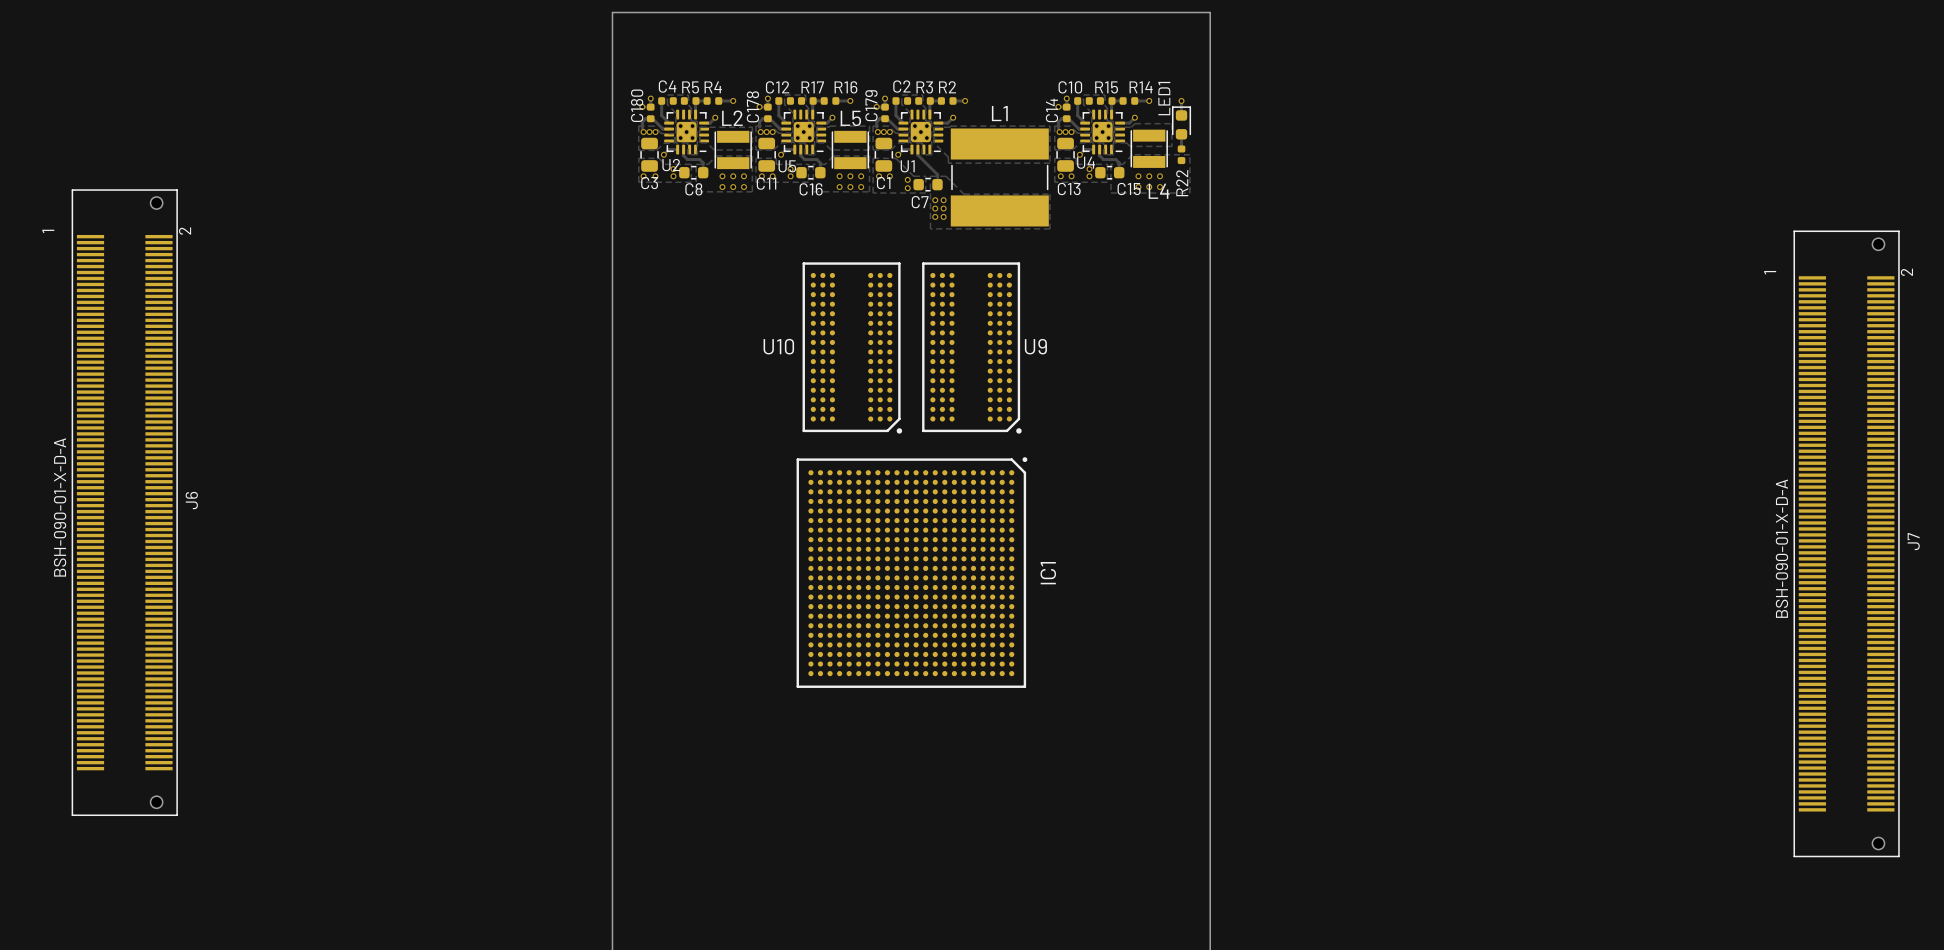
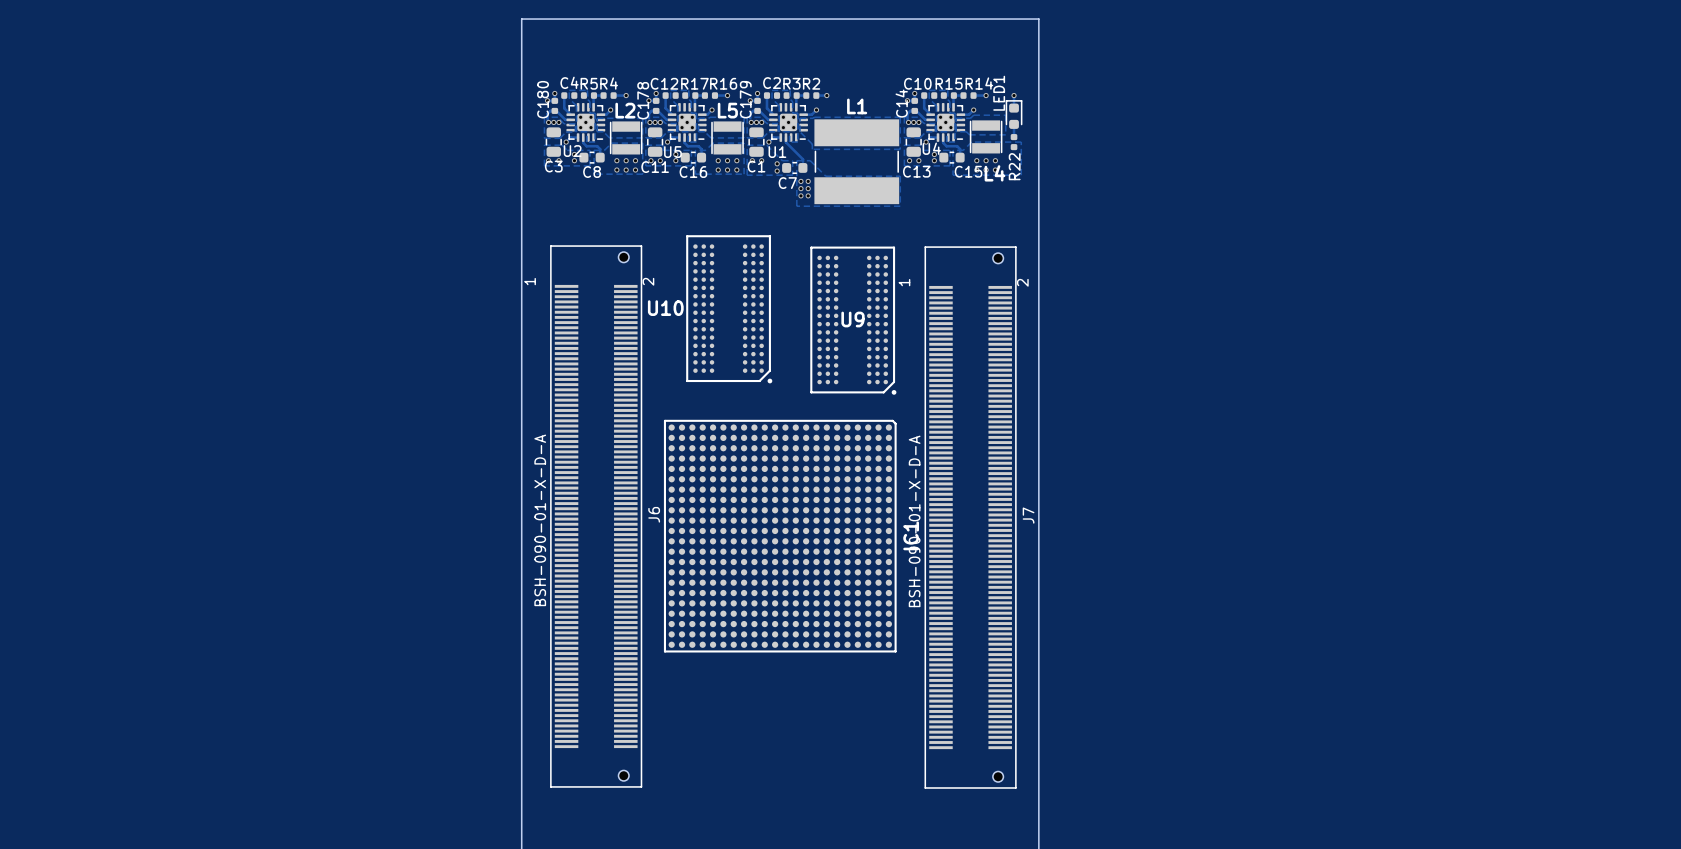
U9 name position: U9 (1035, 346) -> U9 (852, 319)
U9 position: (971, 347) -> (853, 320)
IC1 footprint: [796, 457, 1028, 688] -> [663, 419, 897, 653]
J6 position: (124, 502) -> (596, 516)
J7 position: (1846, 543) -> (970, 517)

